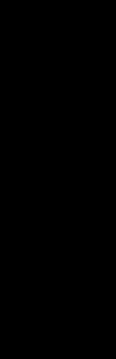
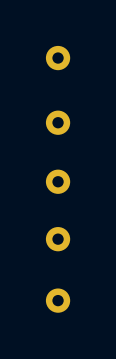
part: none -> (58, 58)
part: none -> (58, 122)
part: none -> (58, 181)
part: none -> (58, 239)
part: none -> (58, 300)

